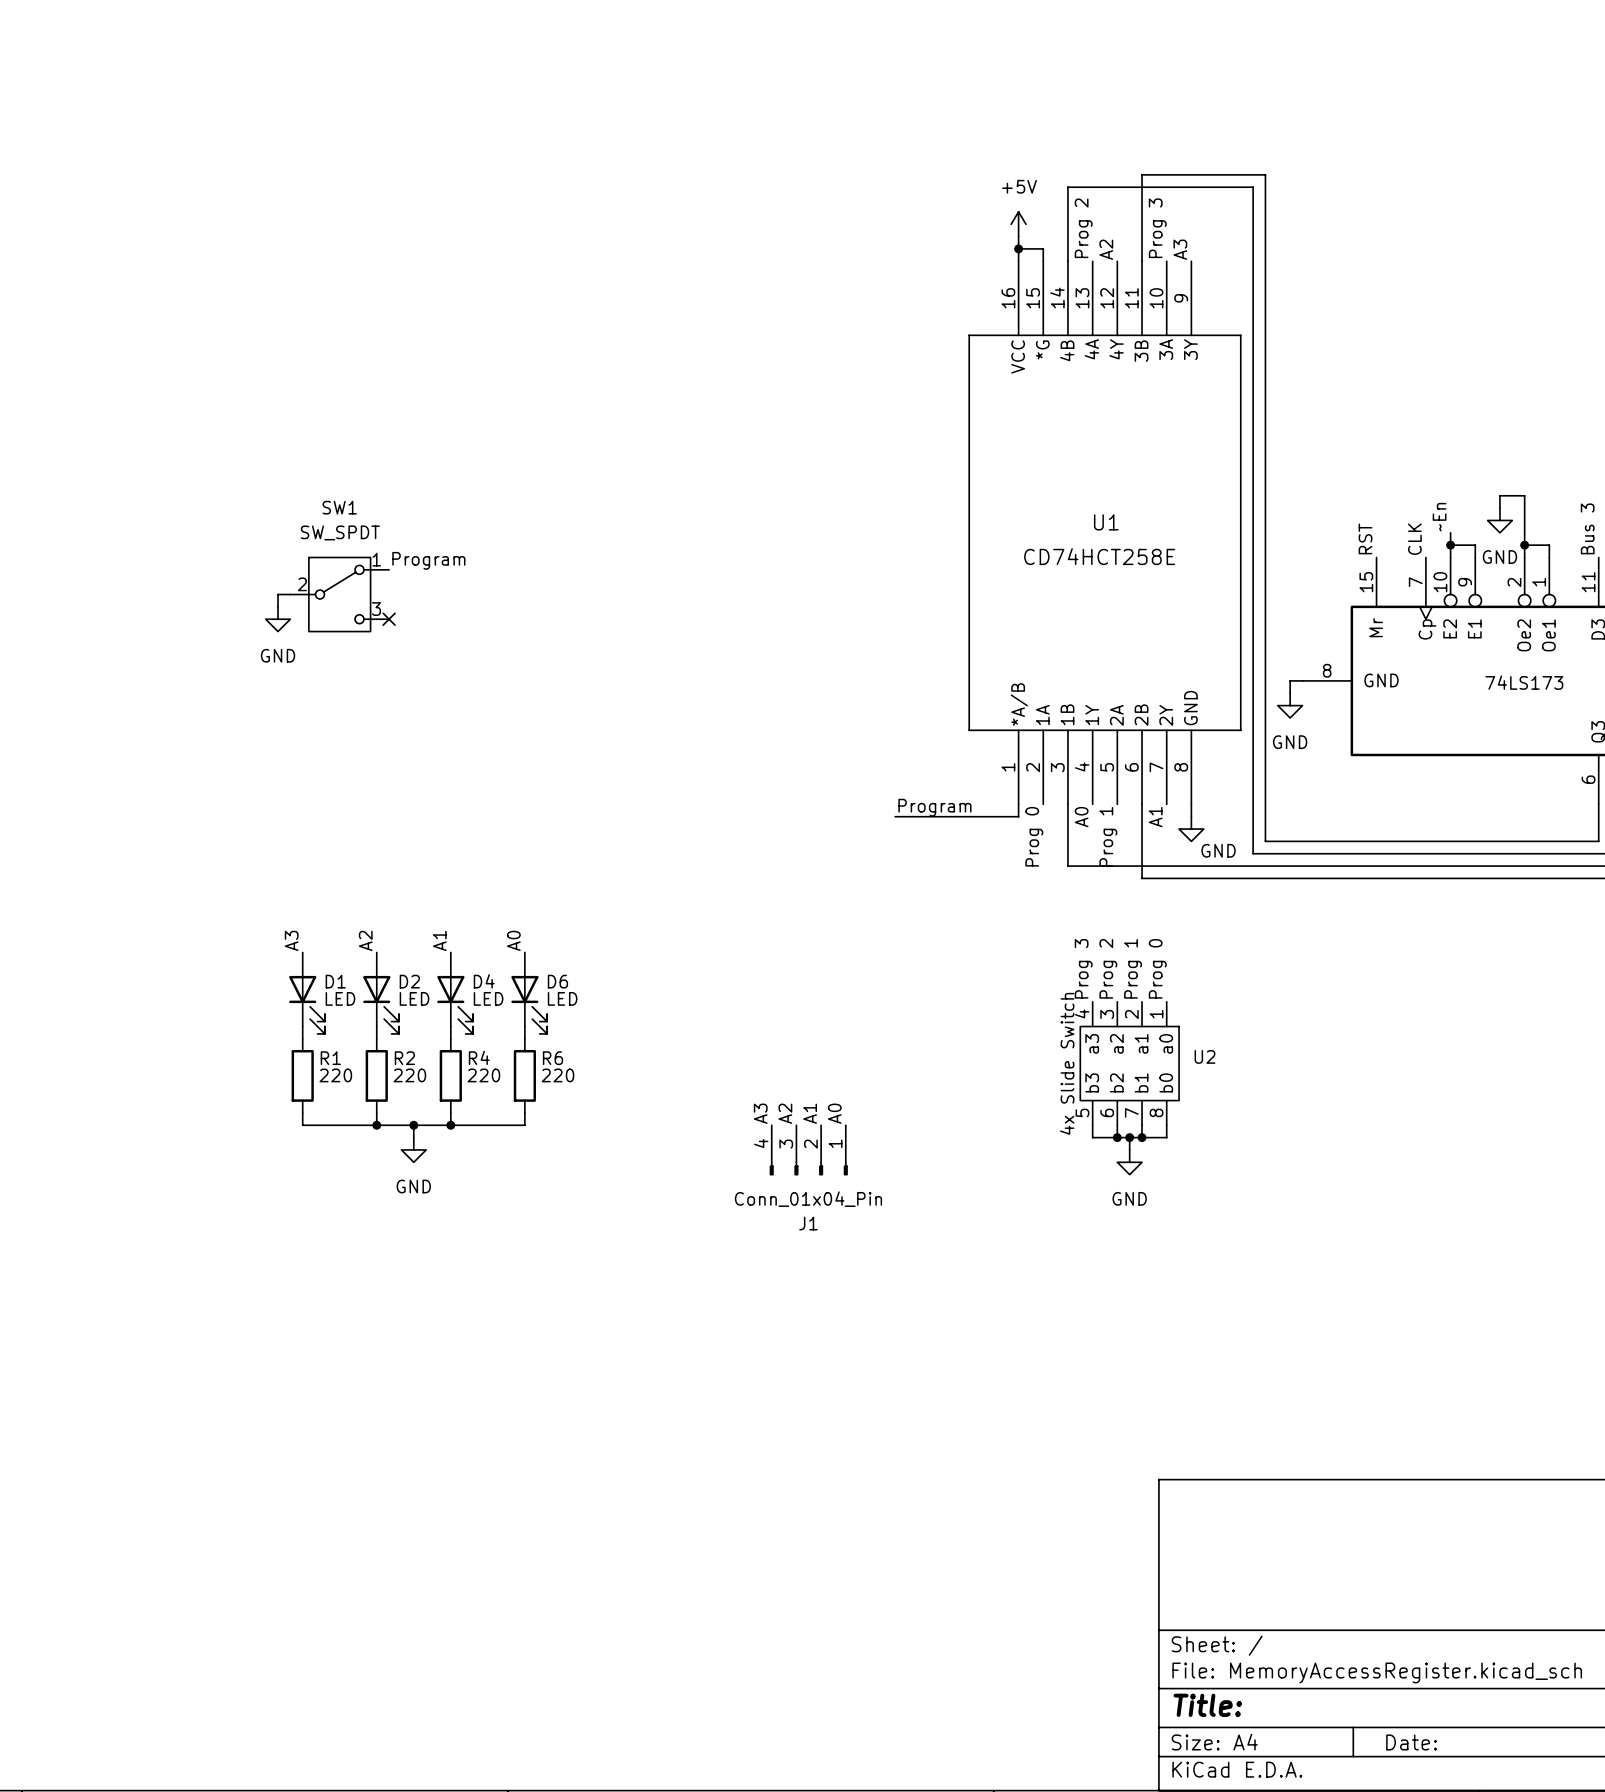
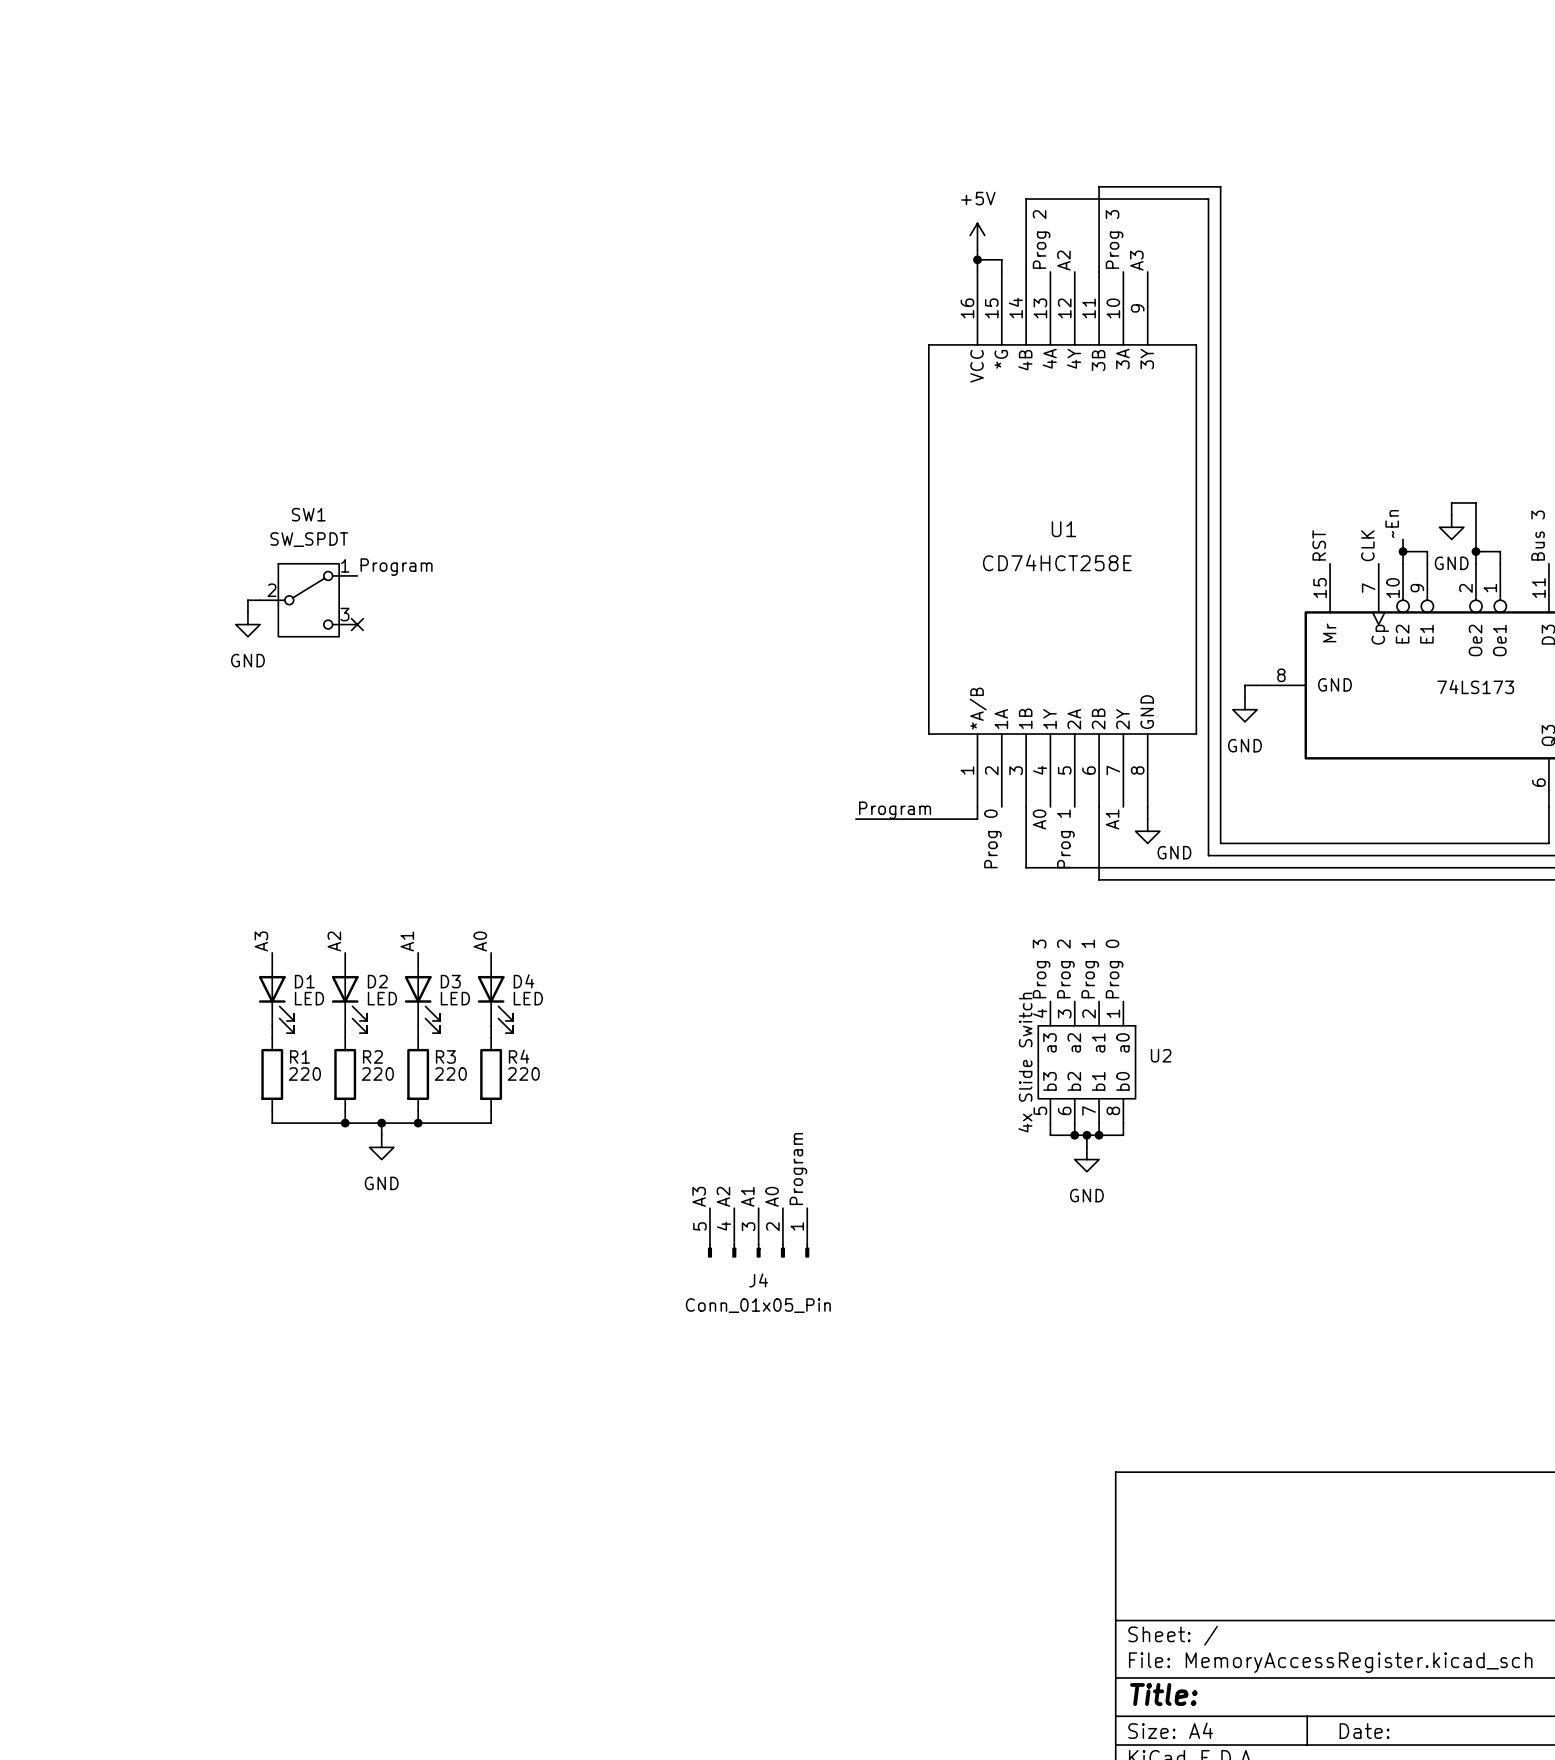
D4 name: D4 (484, 981) -> D3 (450, 981)
D6 name: D6 (557, 981) -> D4 (523, 981)
R4 name: R4 (479, 1057) -> R3 (445, 1056)
R6 name: R6 (553, 1058) -> R4 (519, 1056)
label position: A3 (760, 1113) -> A3 (699, 1196)
label position: A2 (785, 1113) -> A2 (723, 1196)
label position: A1 (810, 1113) -> A1 (747, 1196)
label position: A0 (834, 1113) -> A0 (772, 1196)
J1: Conn_01x04_Pin (808, 1150) -> none
label: none -> Program (798, 1169)
J4: none -> Conn_01x05_Pin (758, 1232)

